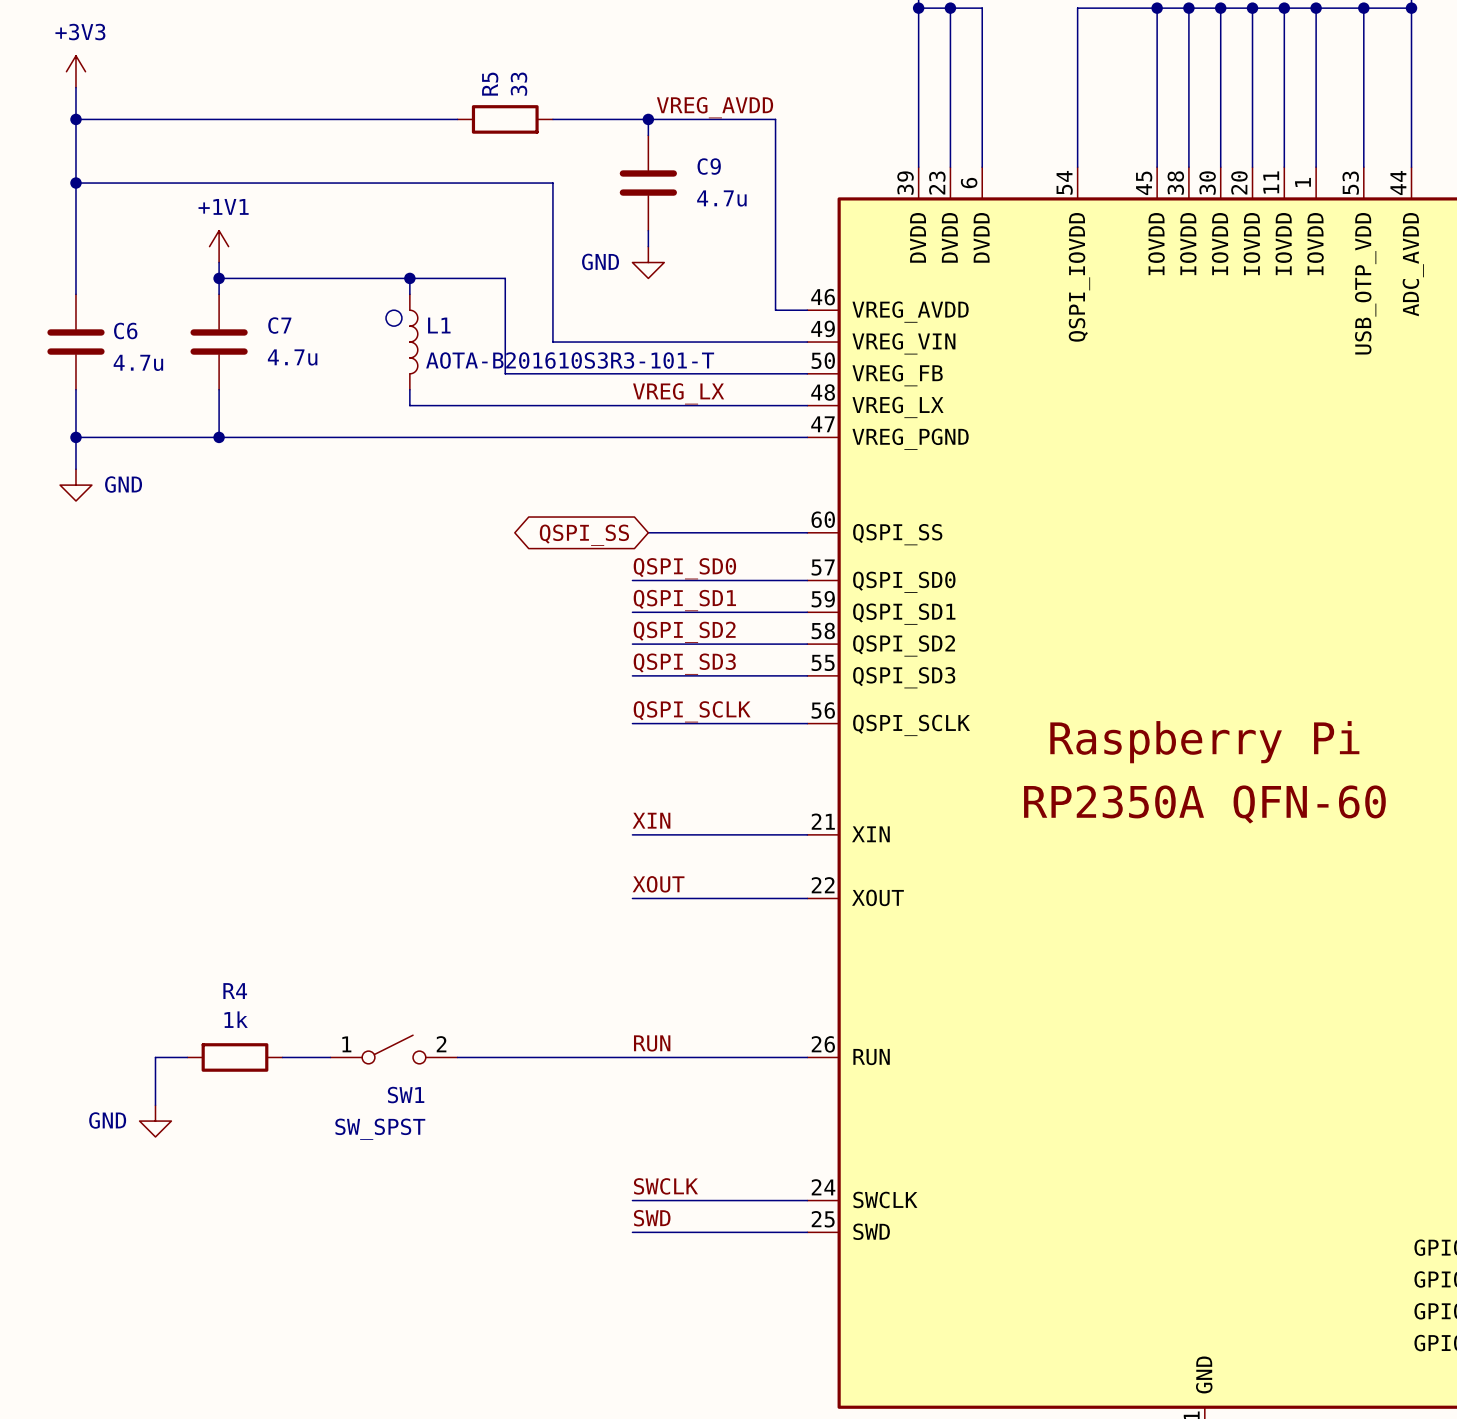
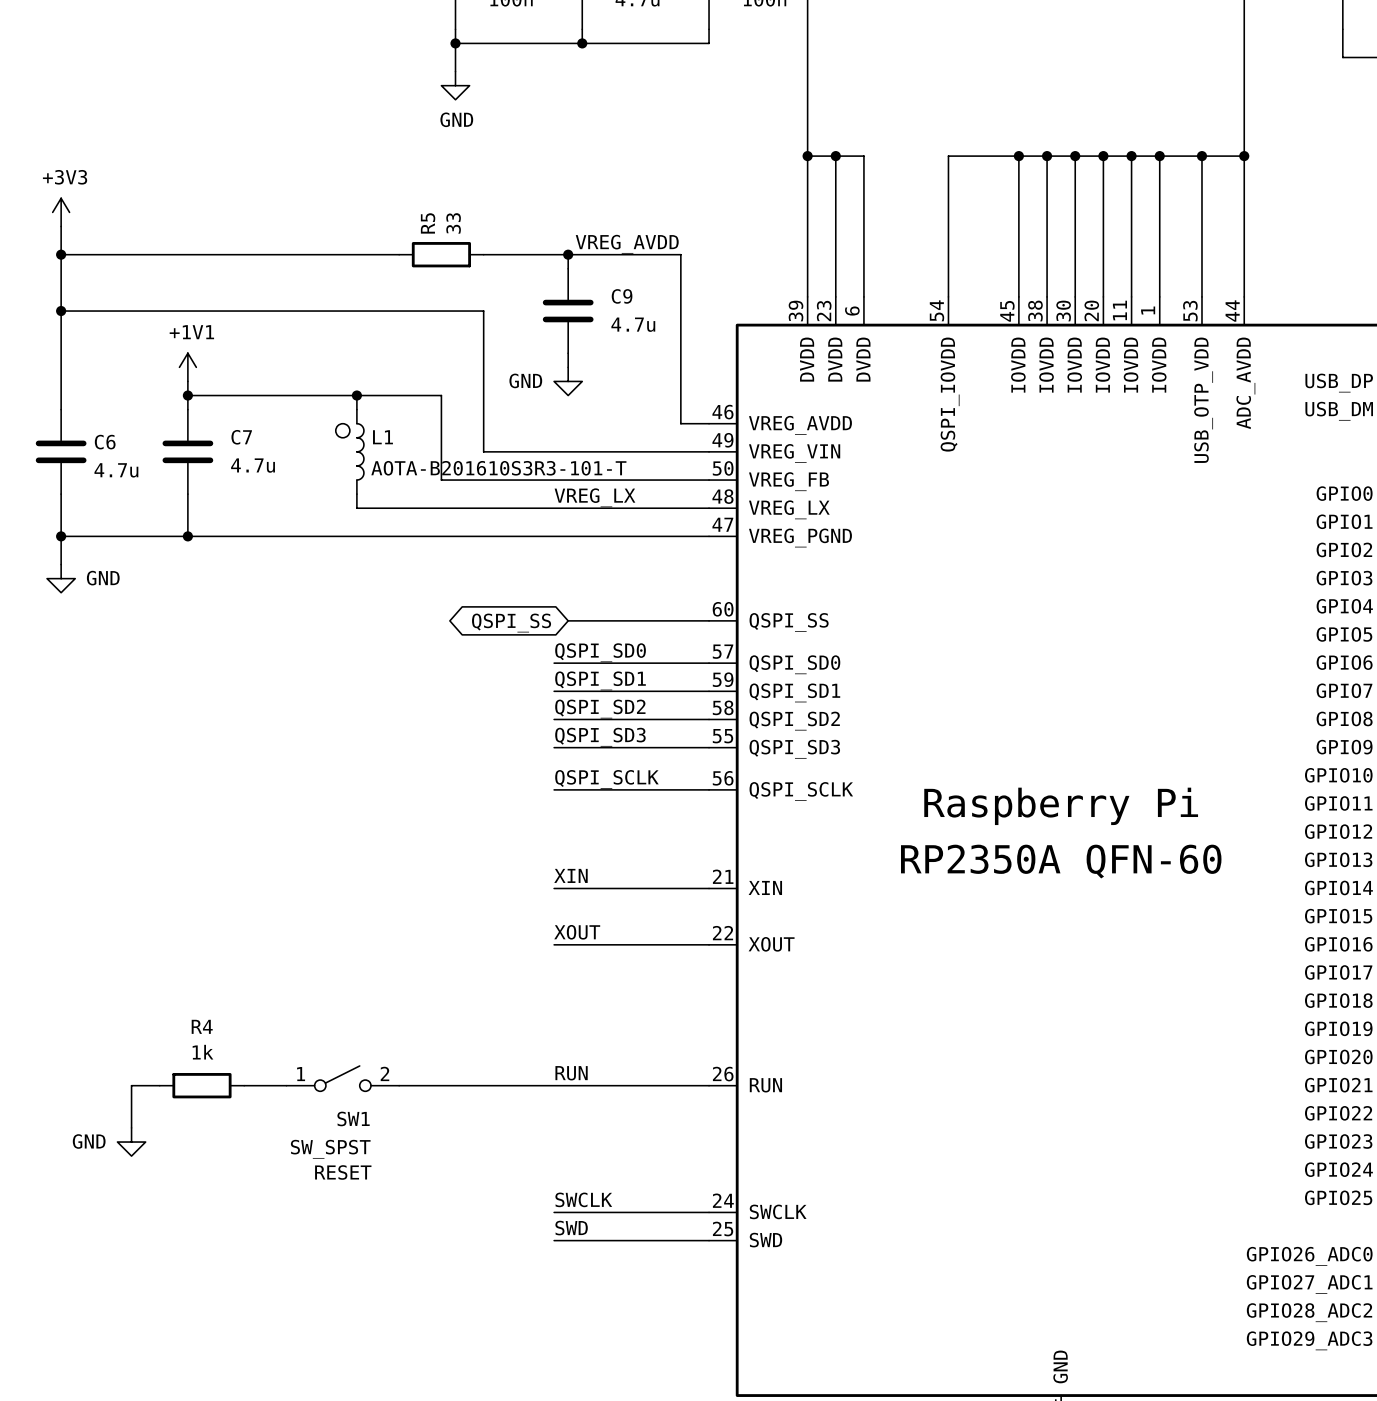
SW1 text: none -> RESET (343, 1172)

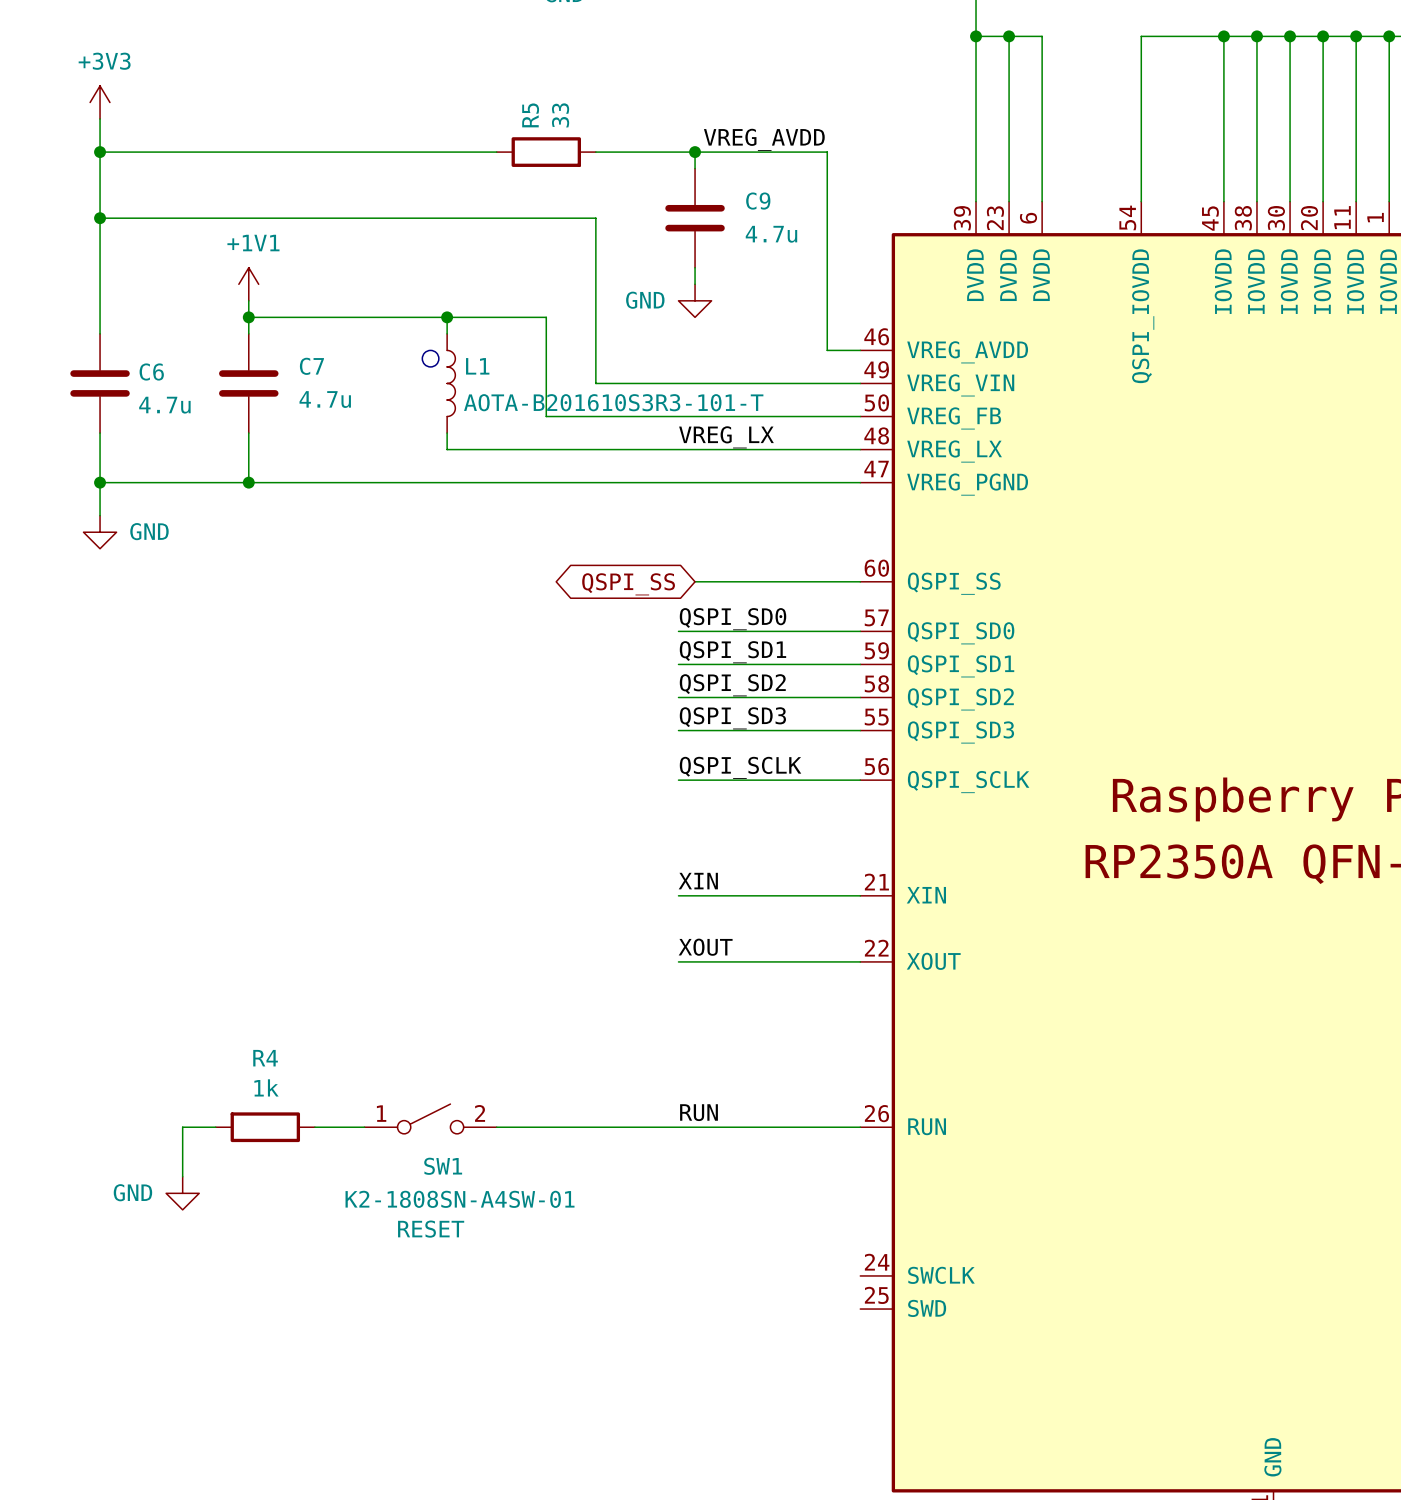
SW1 value: SW_SPST (330, 1149) -> K2-1808SN-A4SW-01 (460, 1199)
label: SWCLK (583, 1199) -> none
wire: (554, 1212) (709, 1212) -> none
label: SWD (571, 1228) -> none
wire: (554, 1240) (709, 1240) -> none

